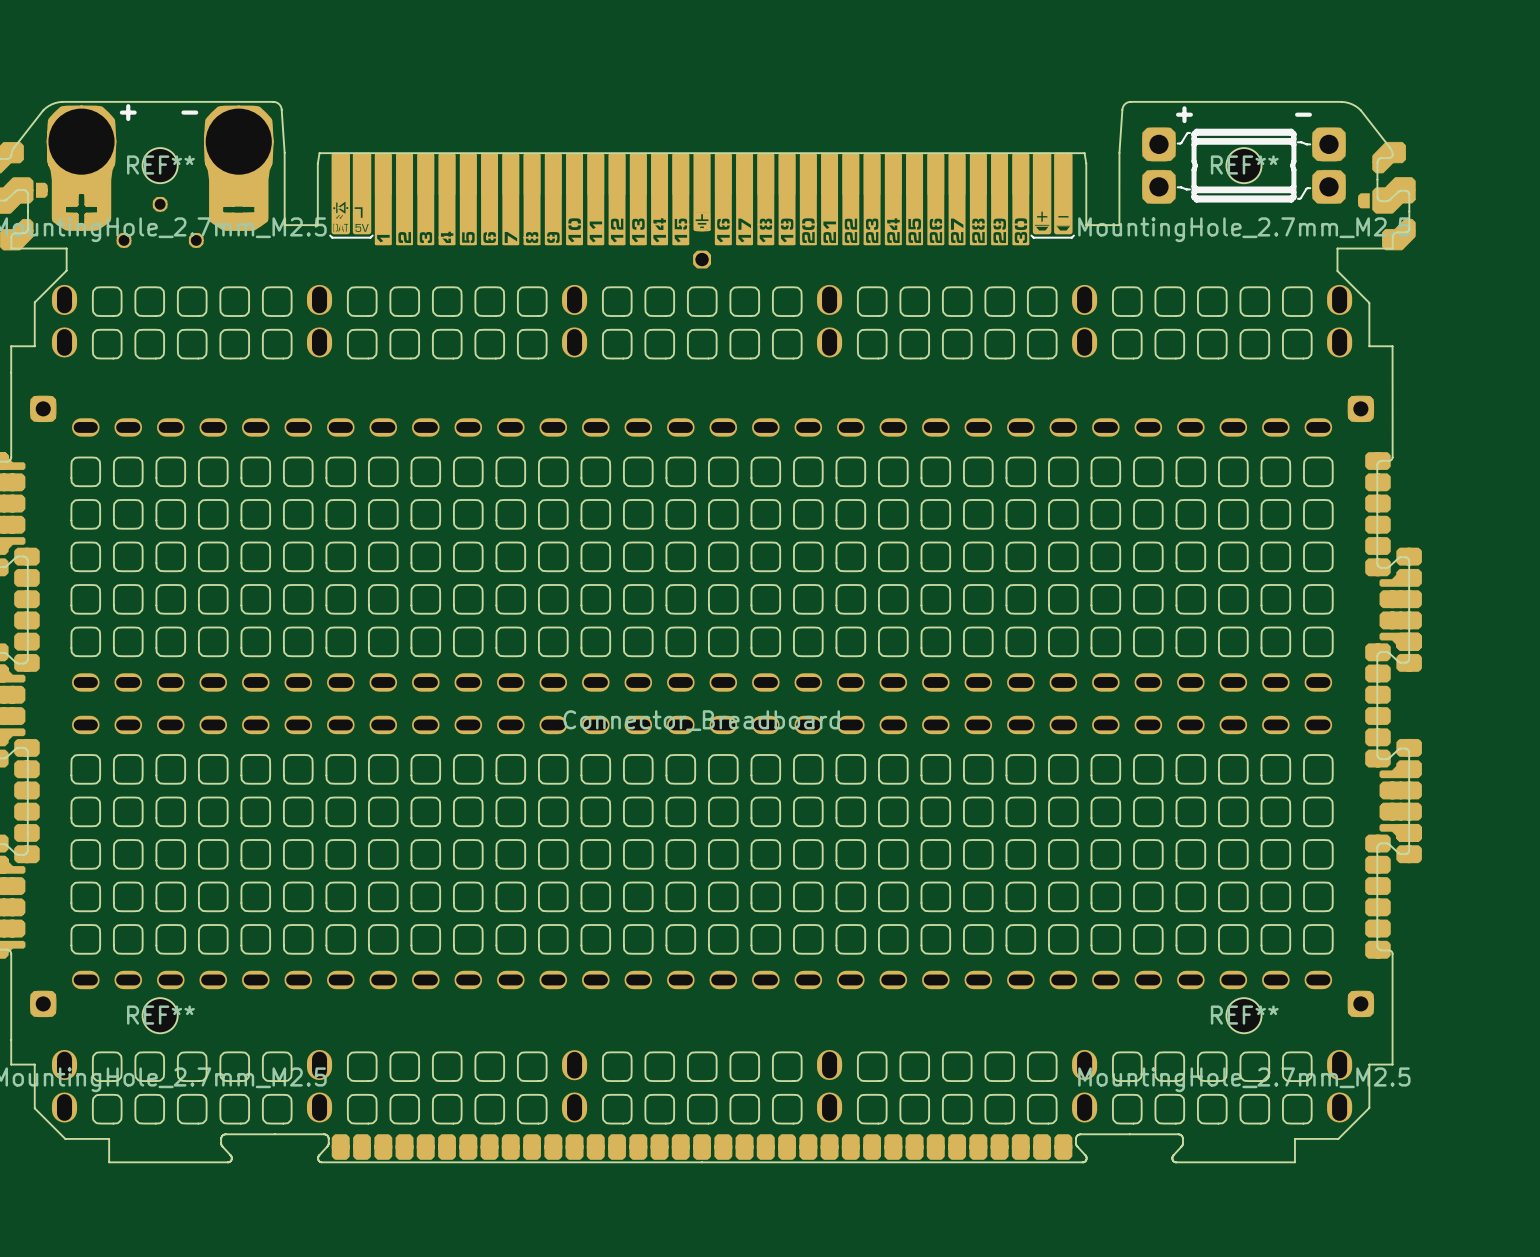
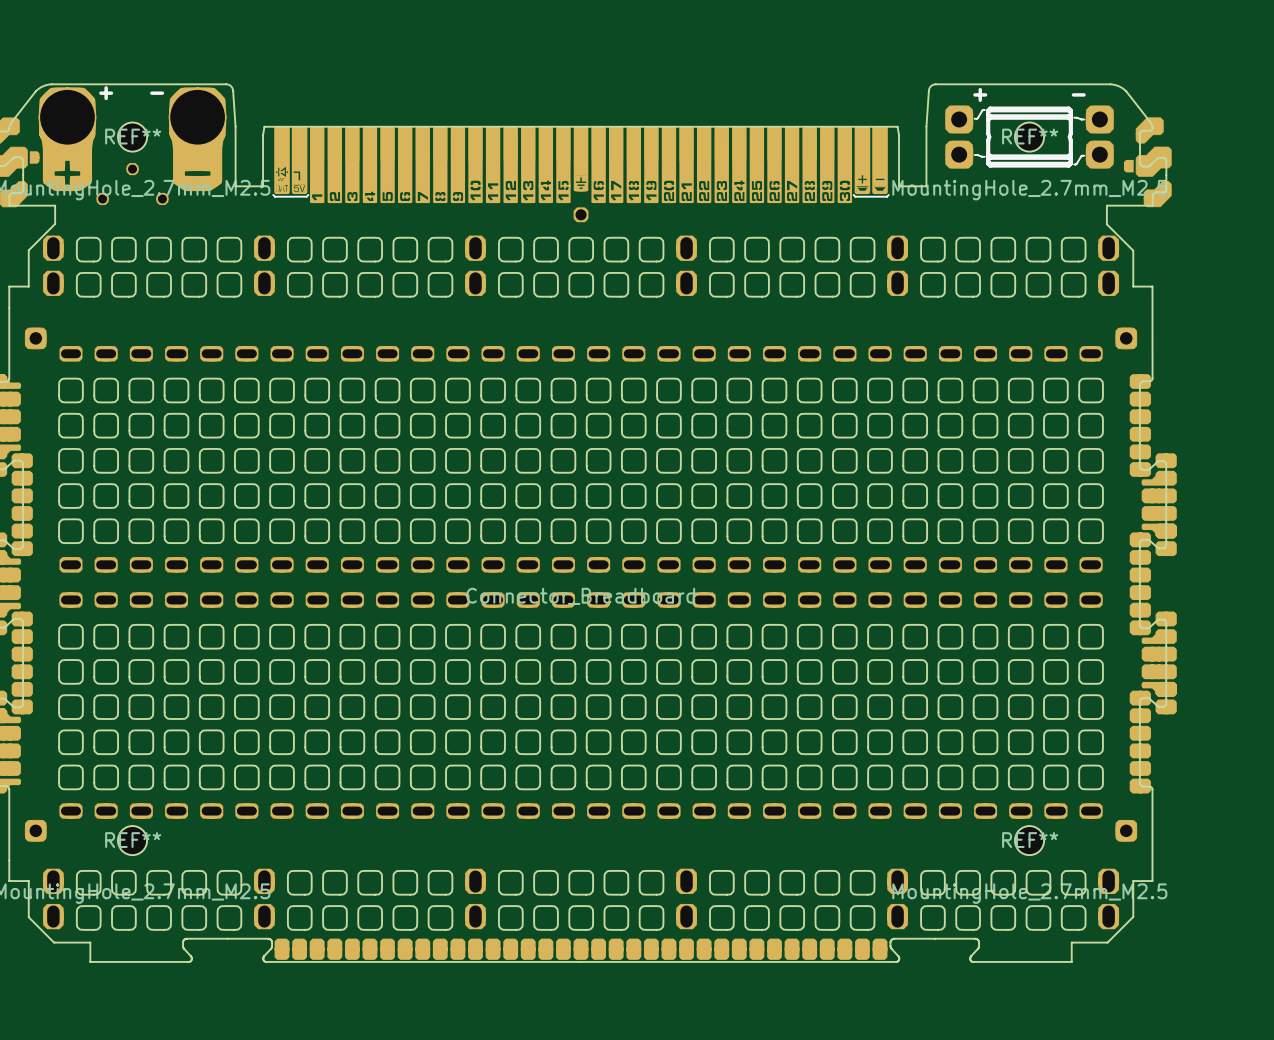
part footprint: [51, 284, 1353, 1123] -> [43, 235, 1120, 930]

